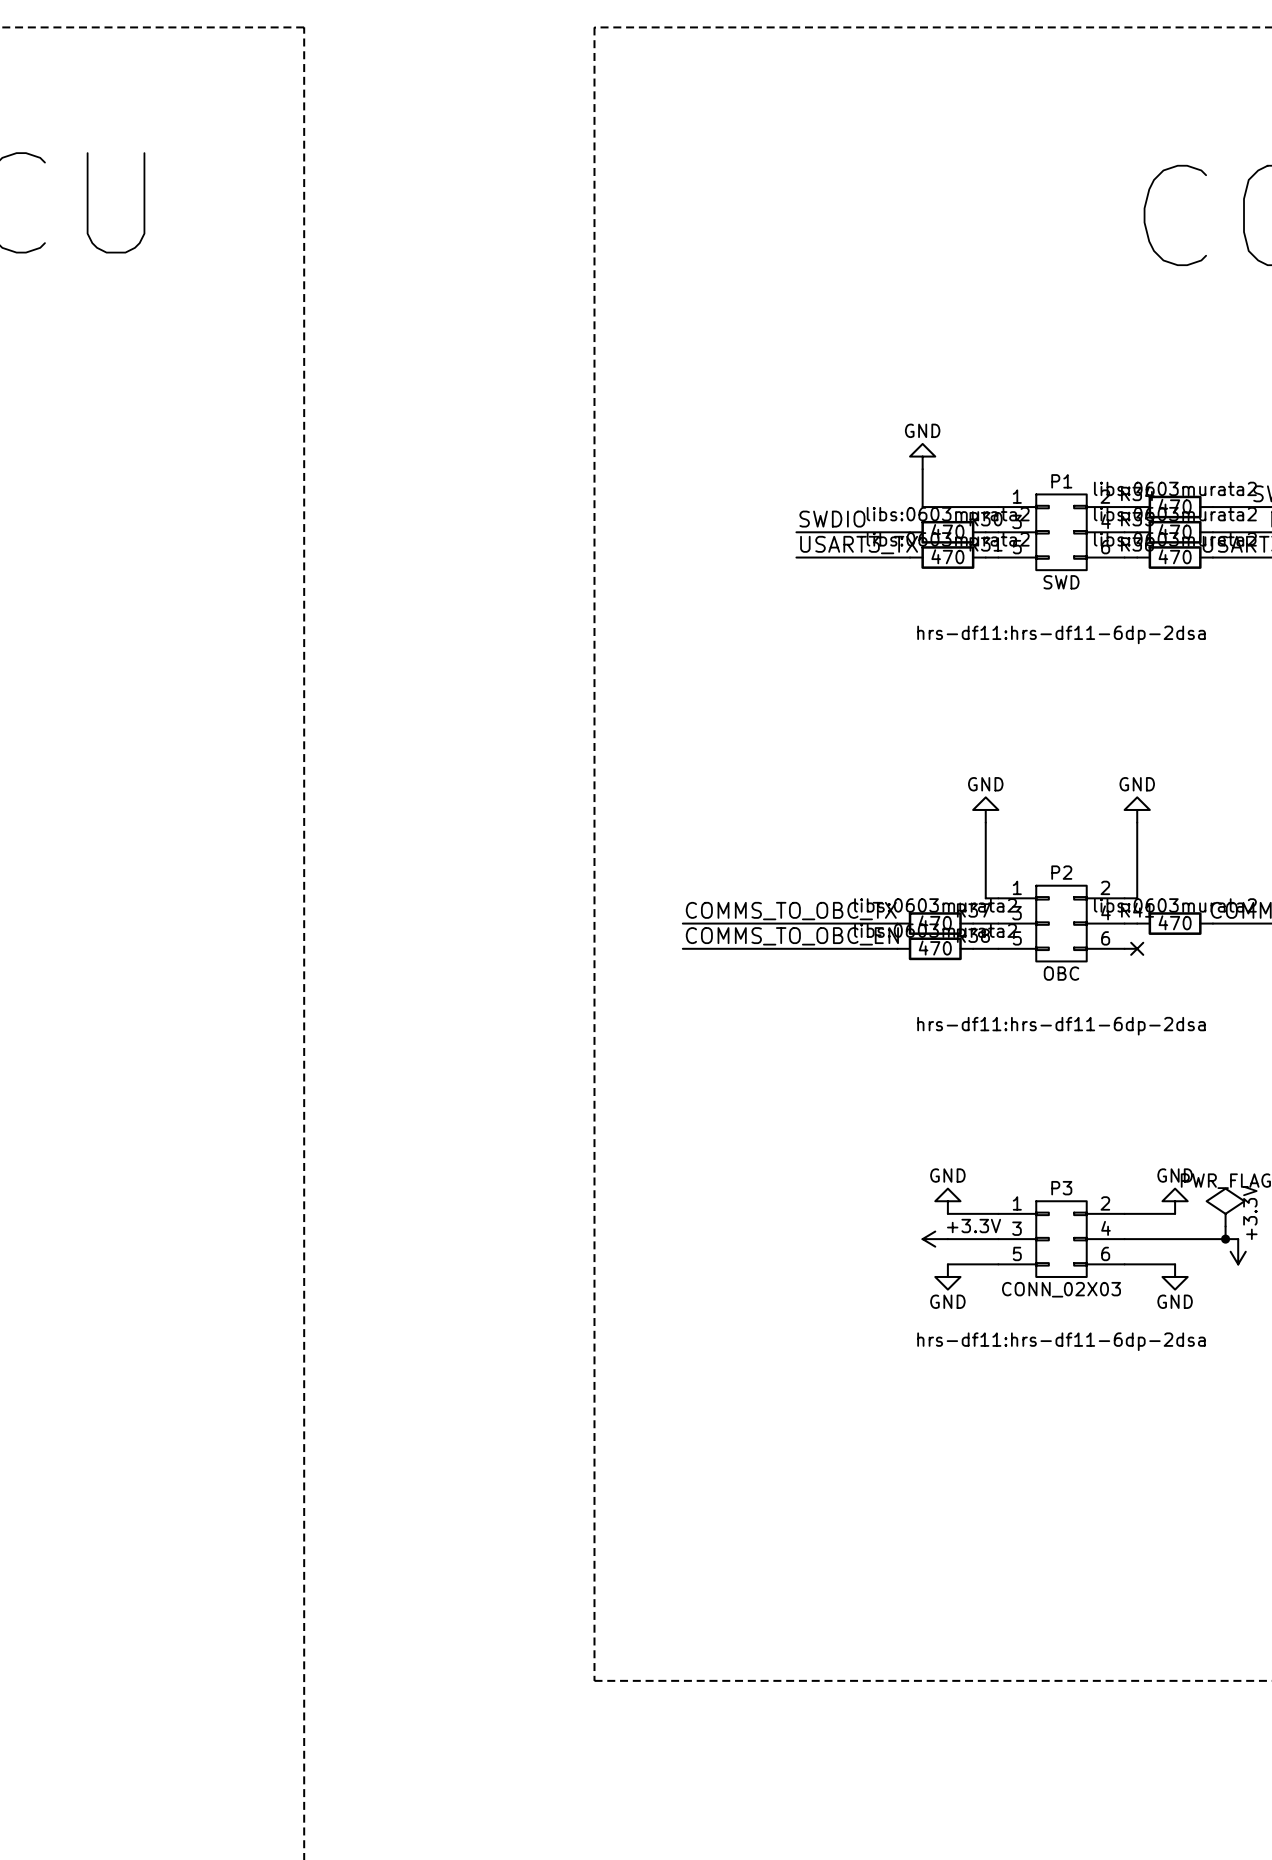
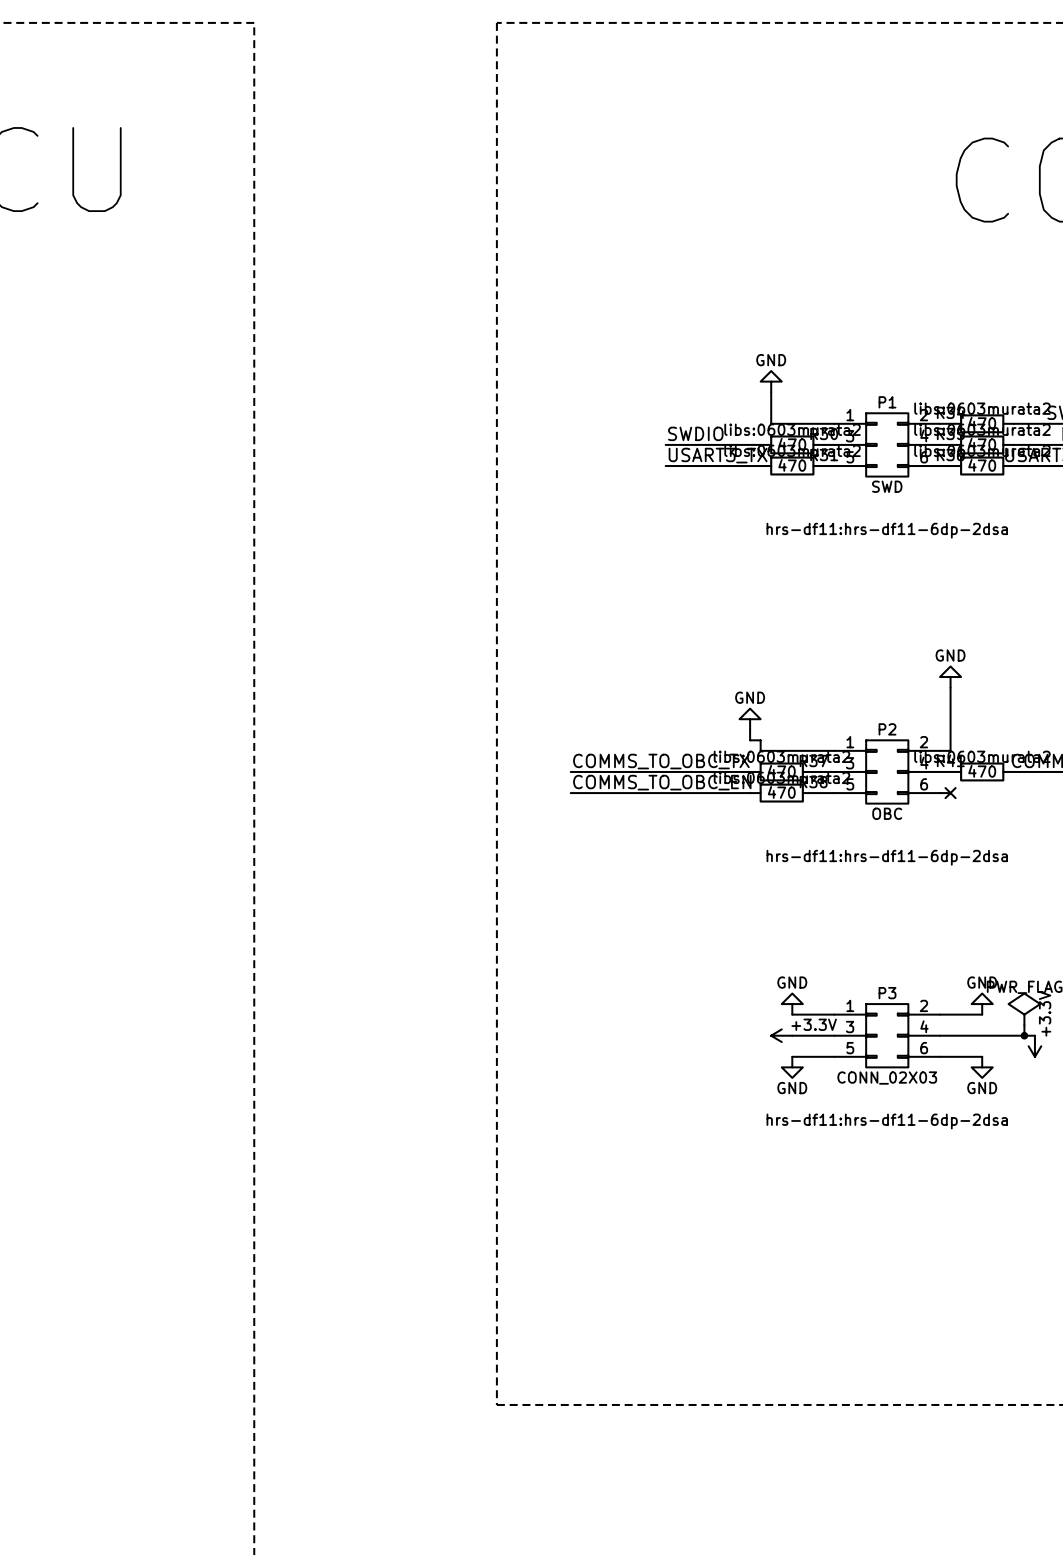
power symbol position: GND (985, 809) -> GND (750, 719)
wire: (985, 822) (985, 898) -> (750, 729) (750, 740) (760, 740) (760, 750) (823, 750)

